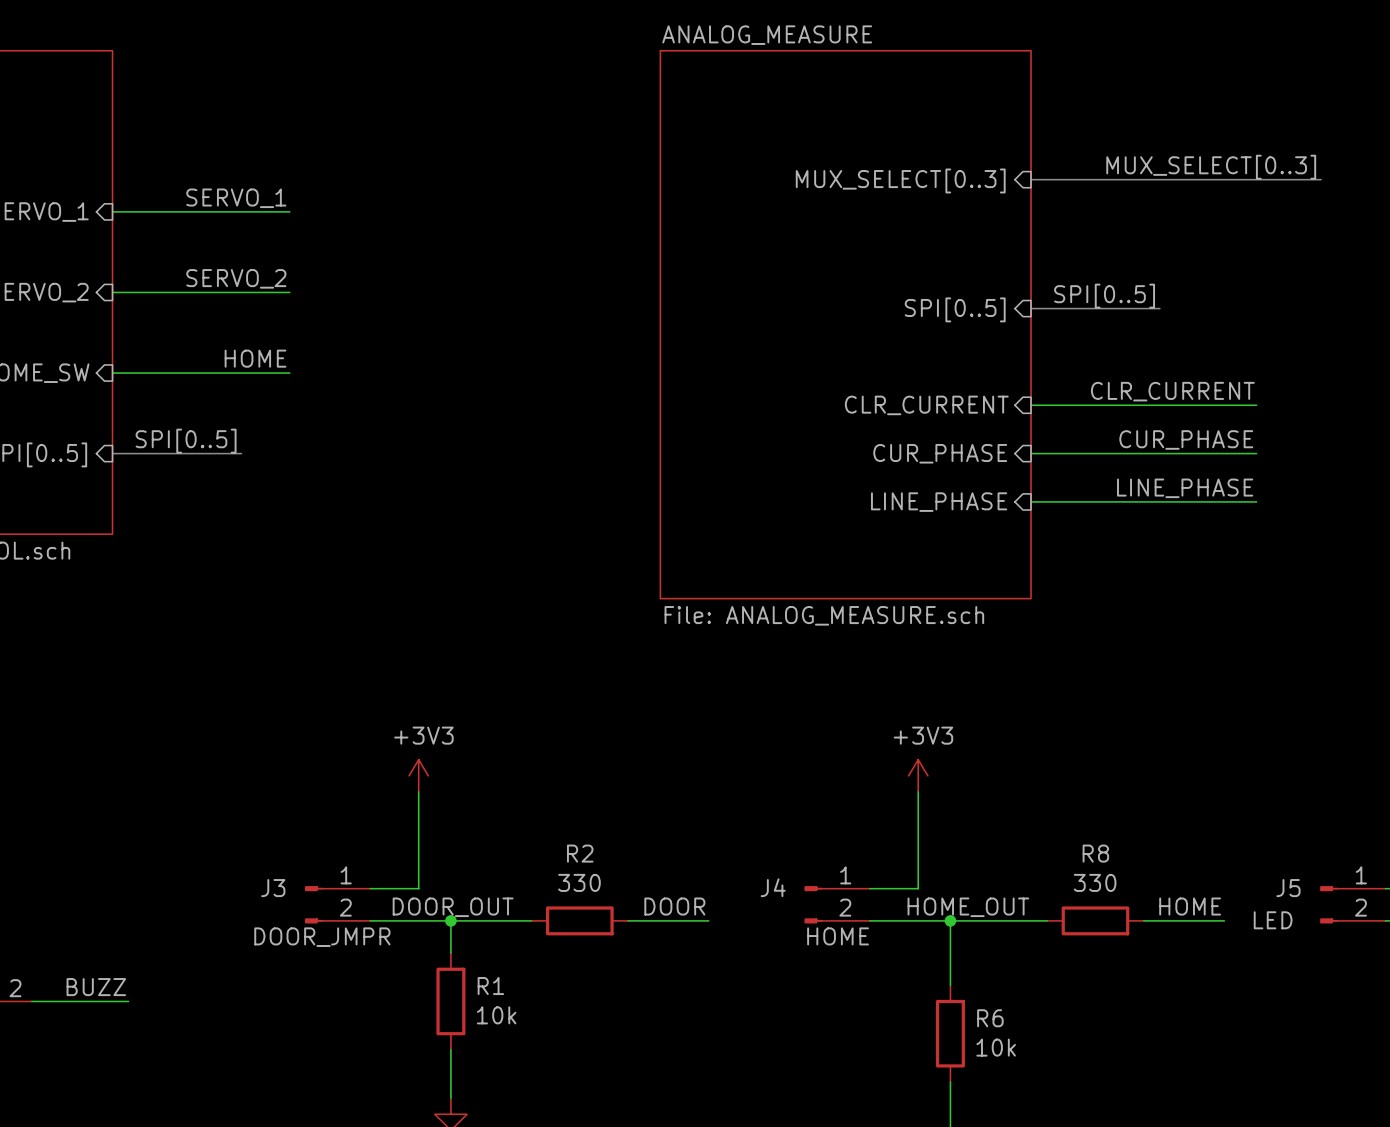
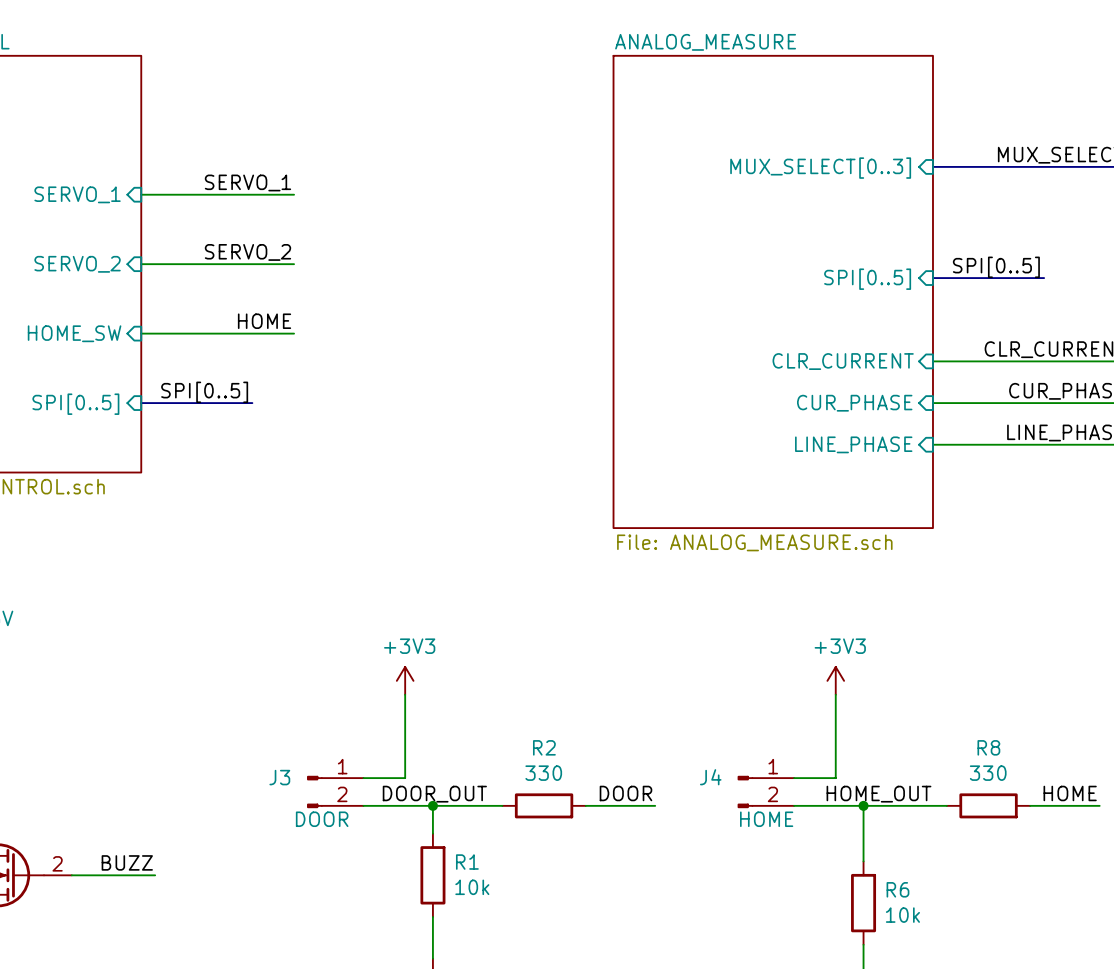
J3 value: DOOR_JMPR (322, 937) -> DOOR (322, 819)

